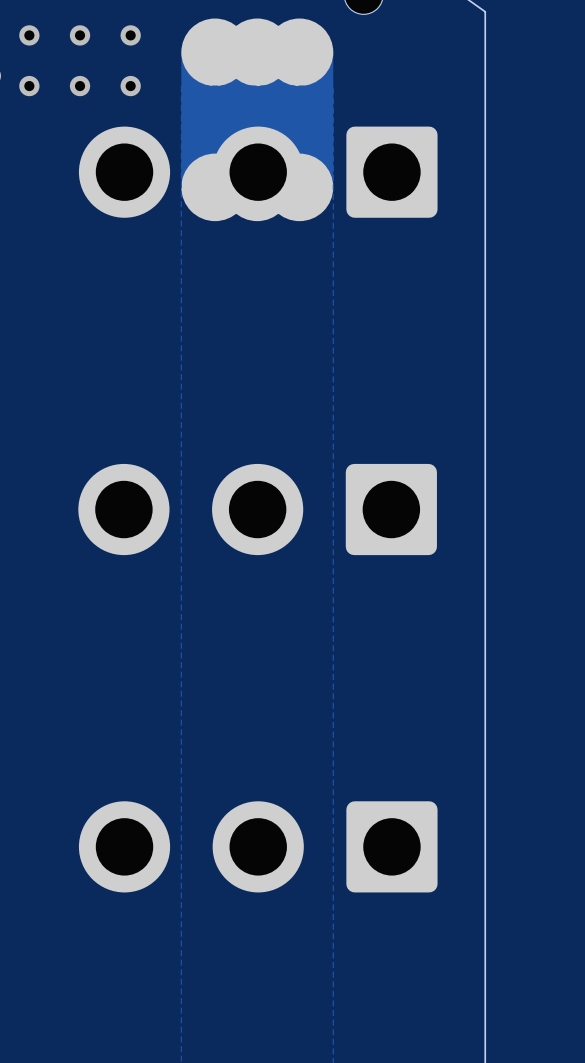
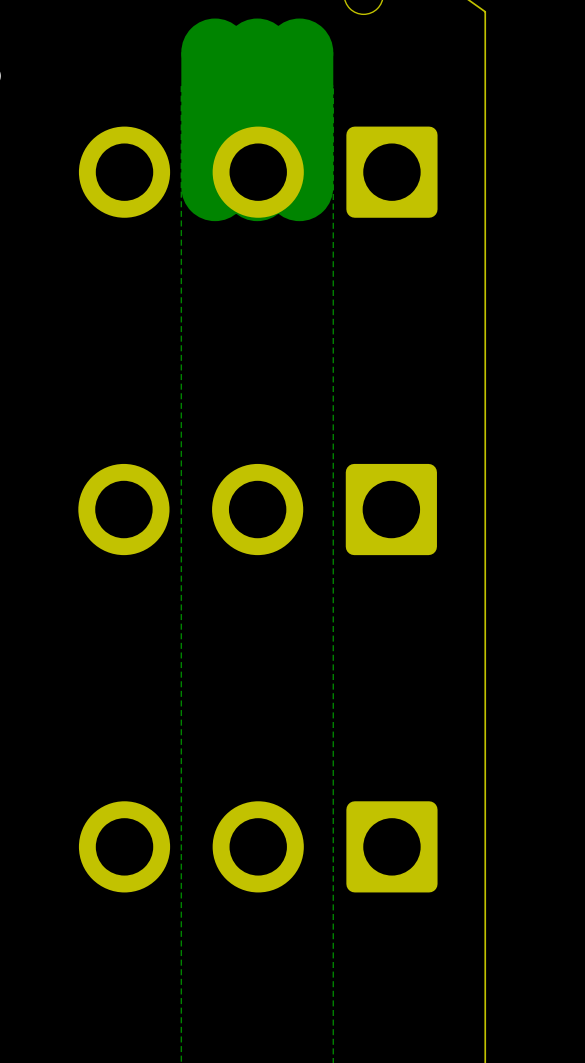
via: (29, 35) -> none
via: (80, 35) -> none
via: (130, 35) -> none
via: (29, 86) -> none
via: (80, 86) -> none
via: (130, 86) -> none

